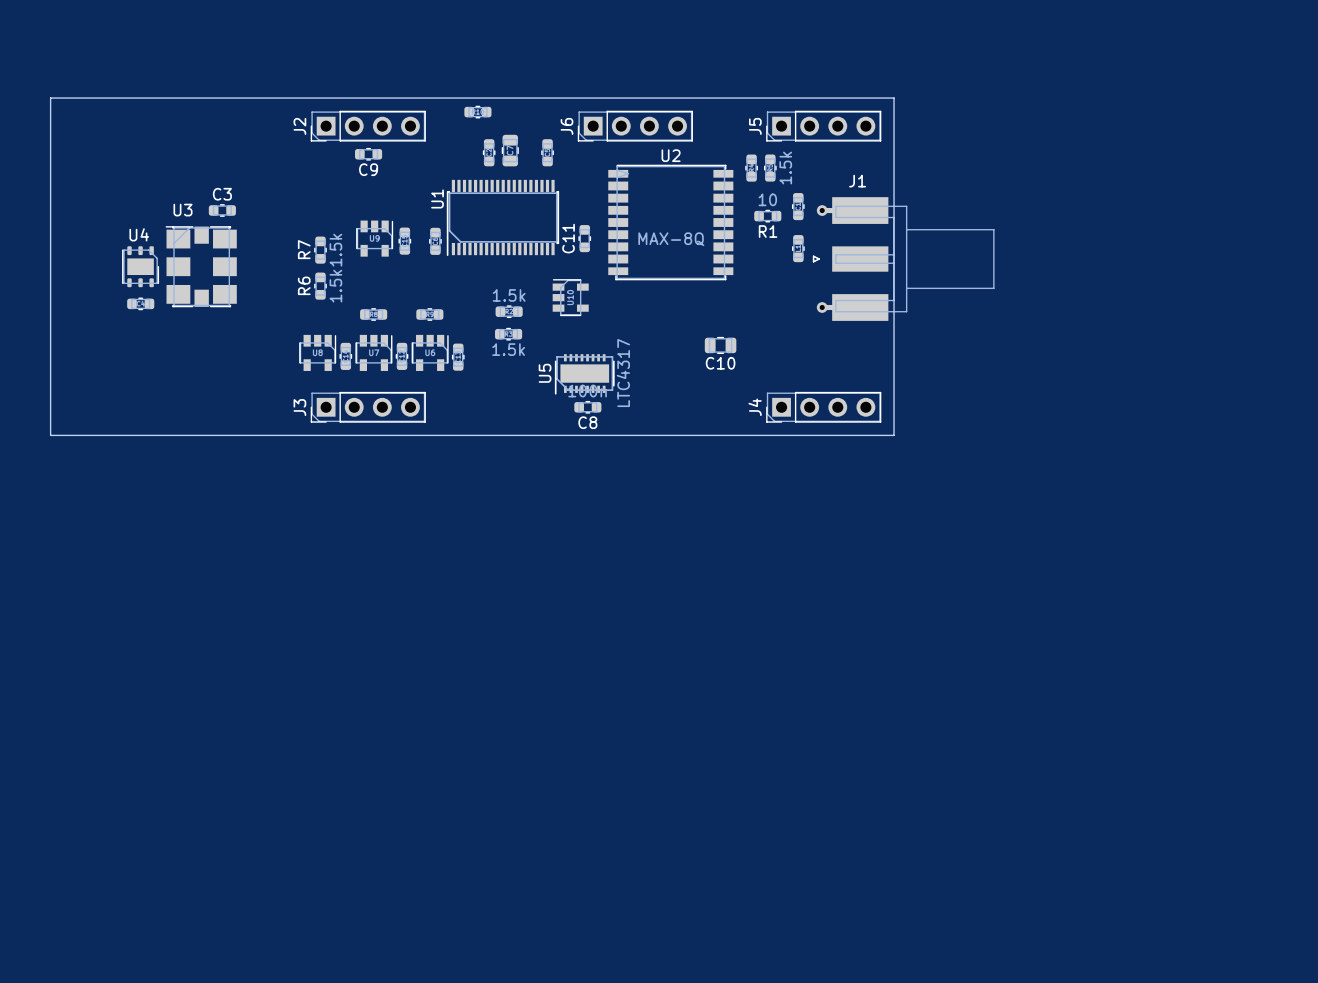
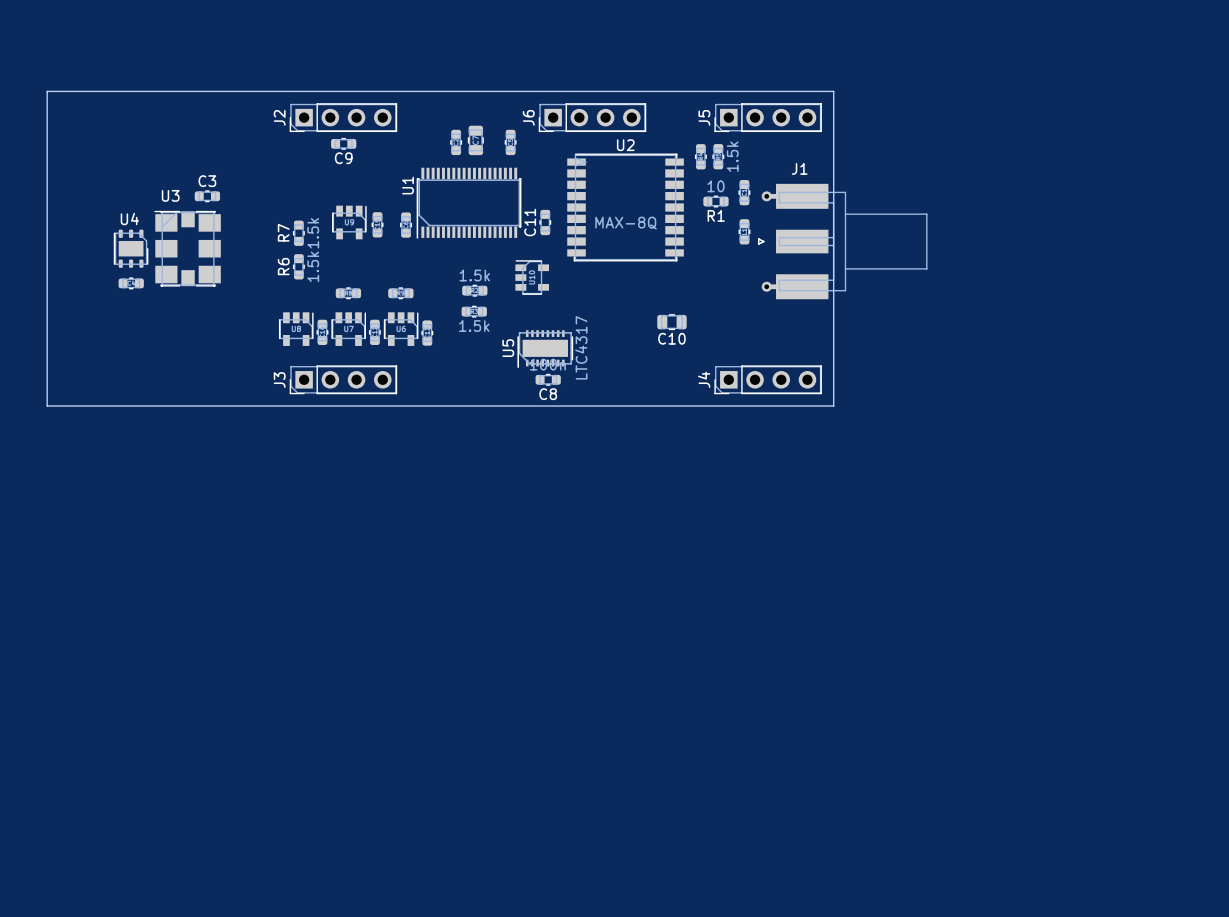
part: (477, 112) -> none

